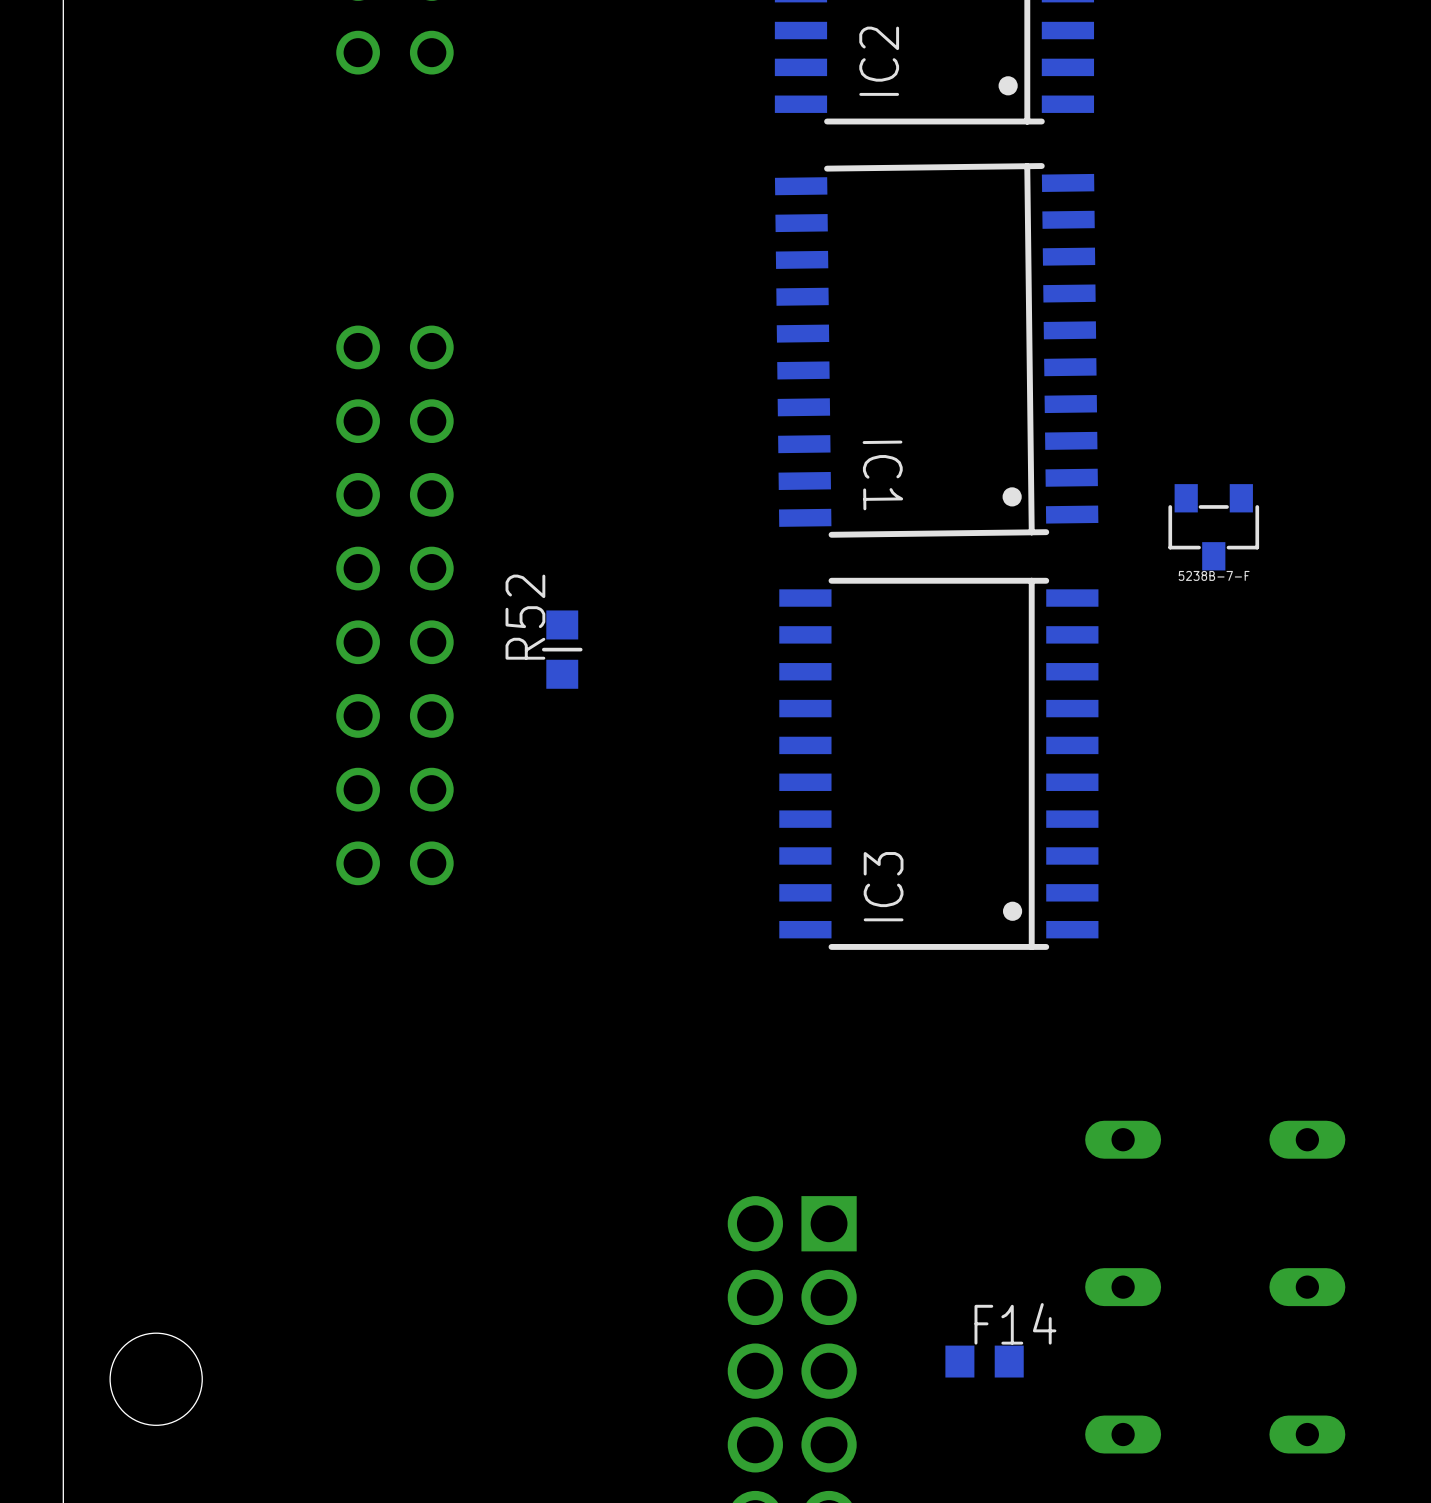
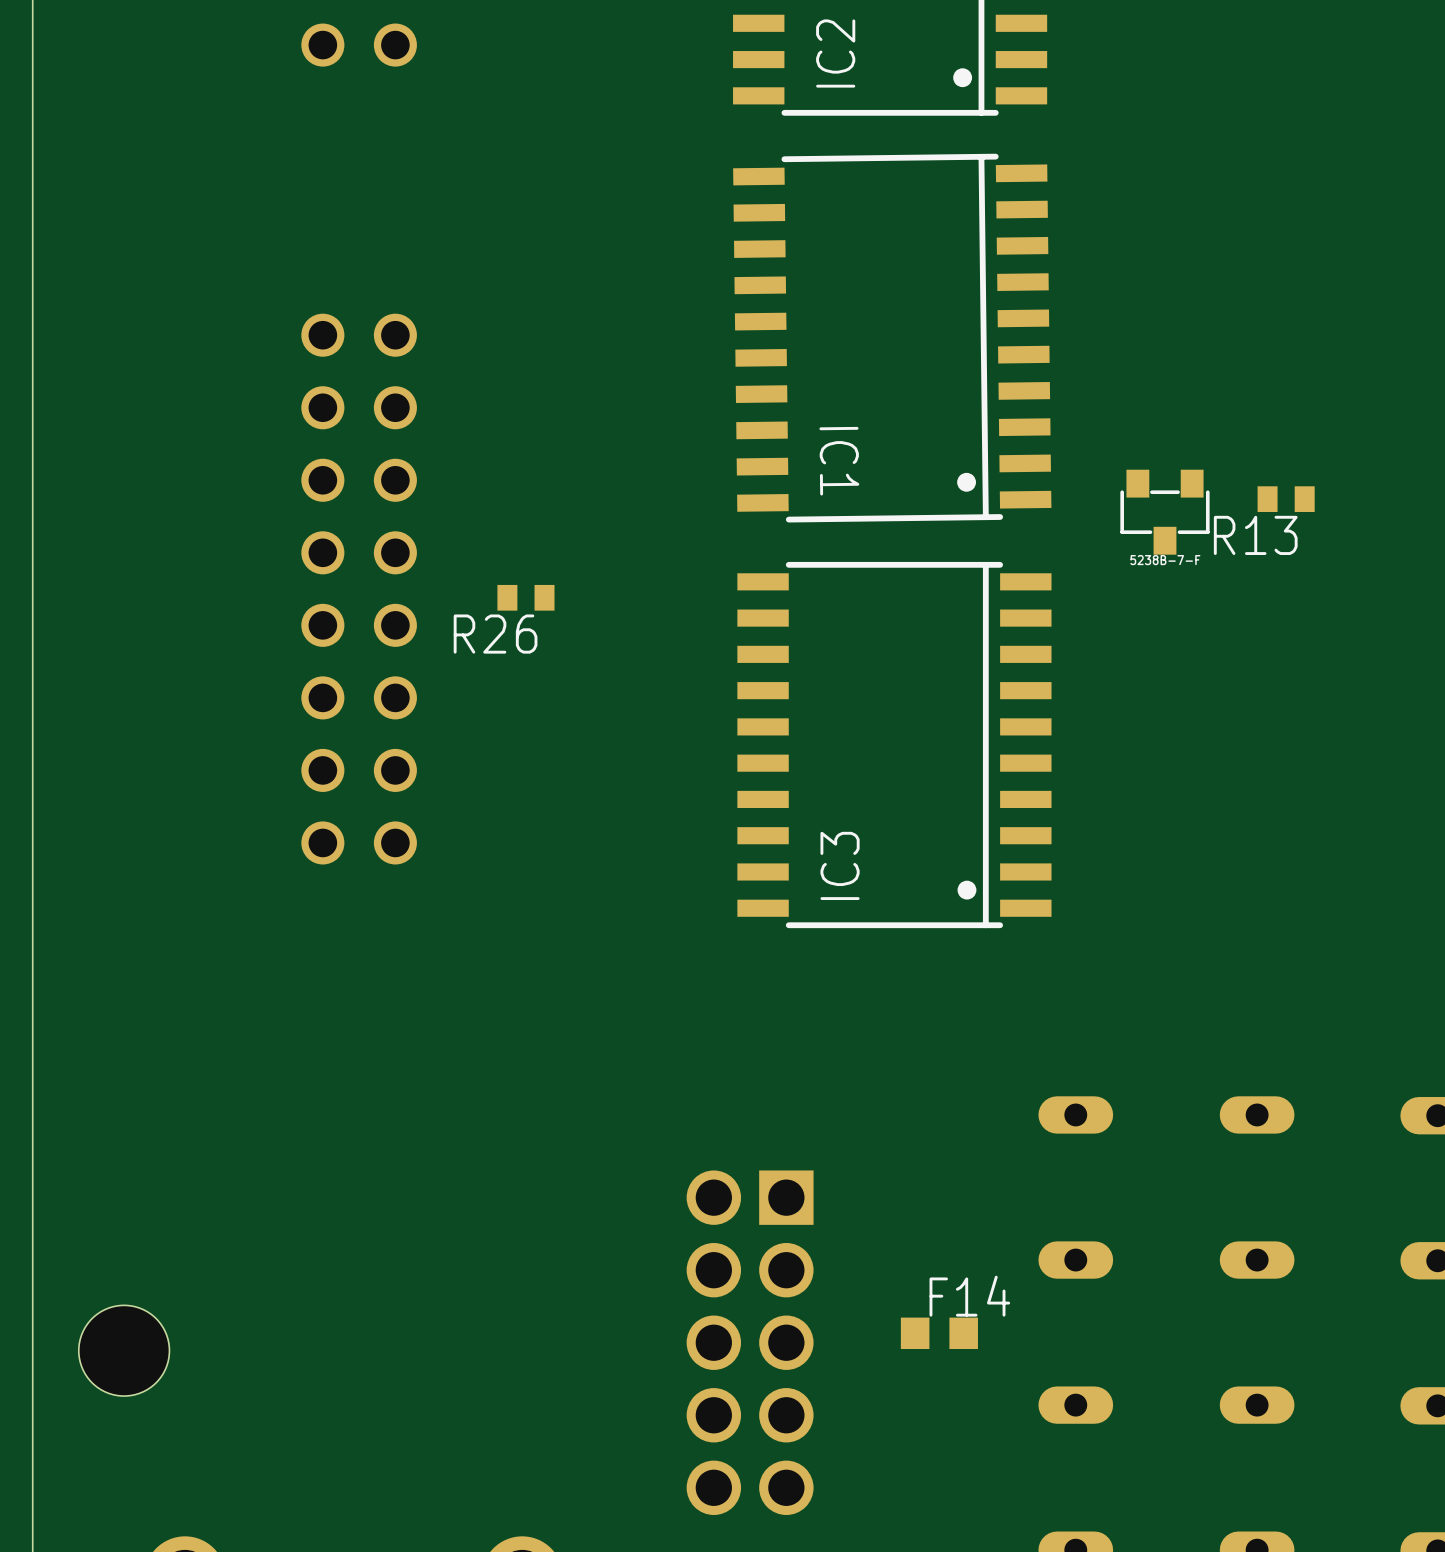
R13: none -> (1286, 499)
R26: none -> (525, 597)
R52: (562, 649) -> none

